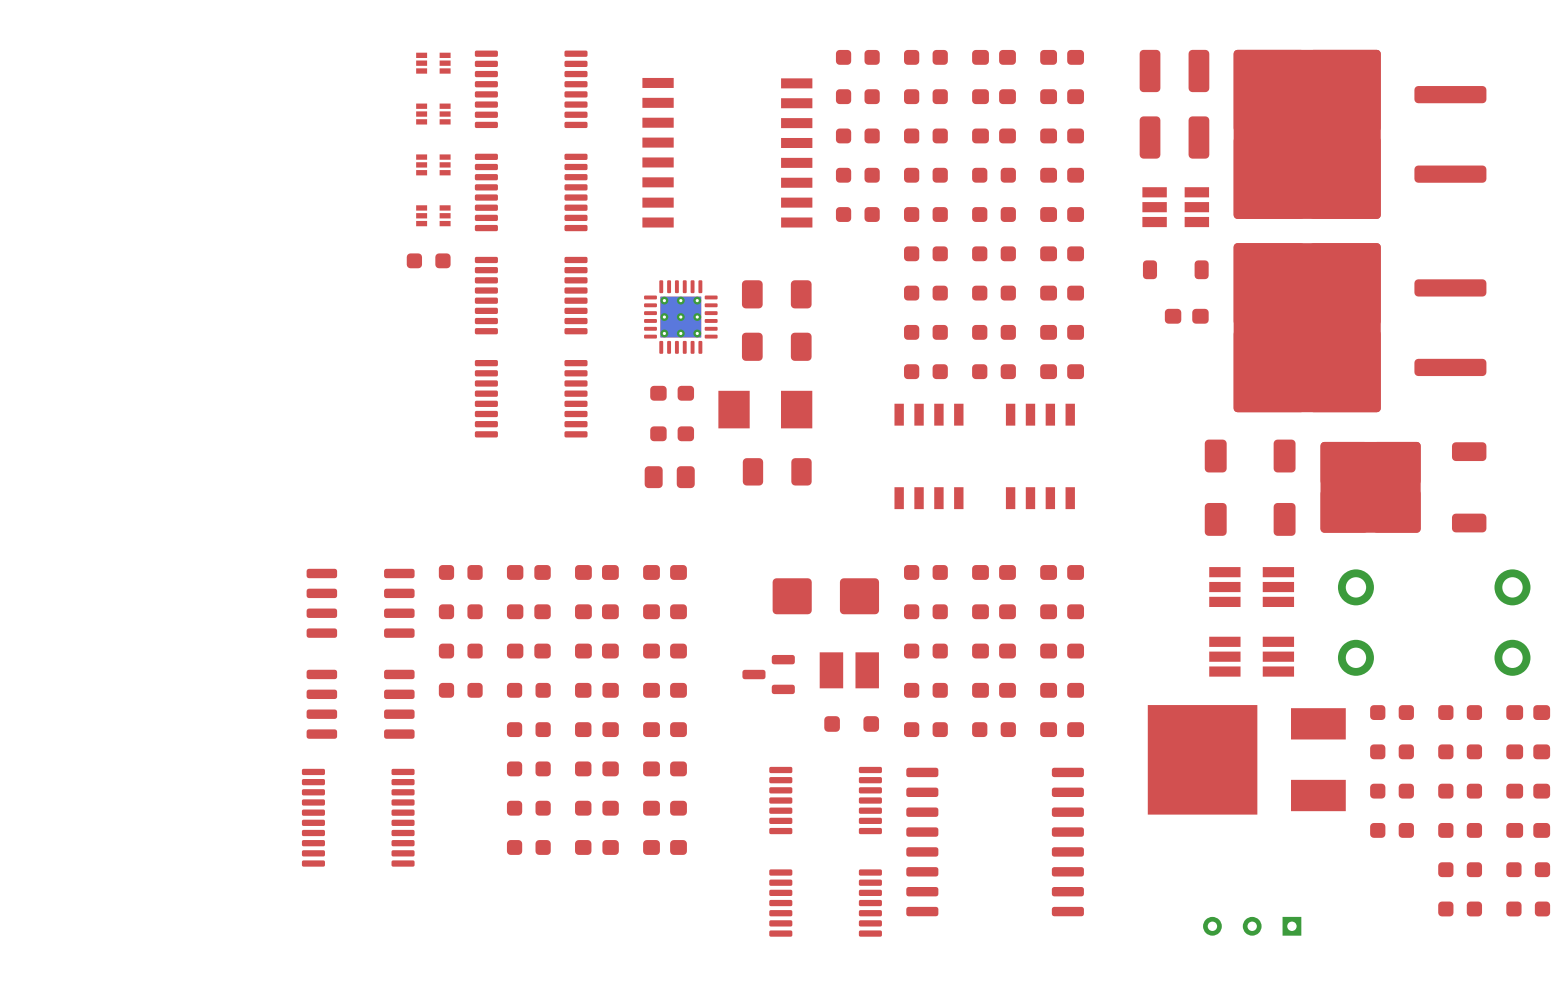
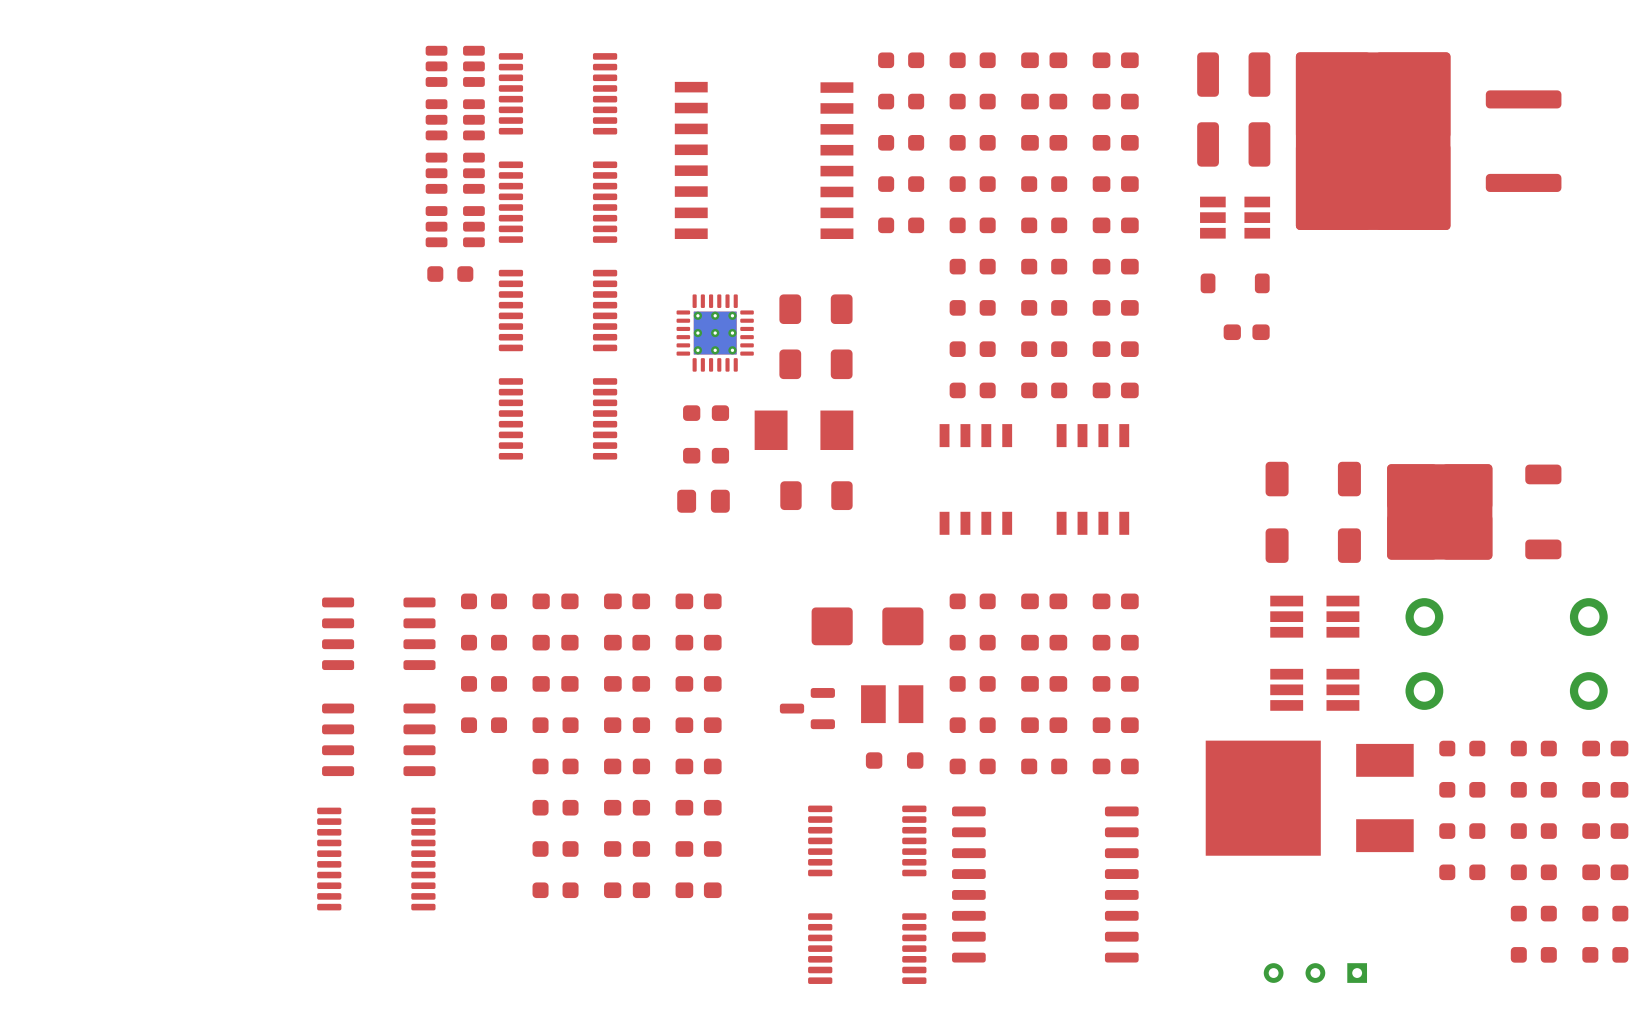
part footprint: [416, 52, 451, 74] -> [425, 45, 485, 87]
part footprint: [416, 103, 451, 125] -> [425, 99, 485, 141]
part footprint: [416, 154, 451, 176] -> [425, 152, 485, 194]
part footprint: [416, 205, 451, 227] -> [425, 206, 485, 248]
part: (1360, 327) -> none

